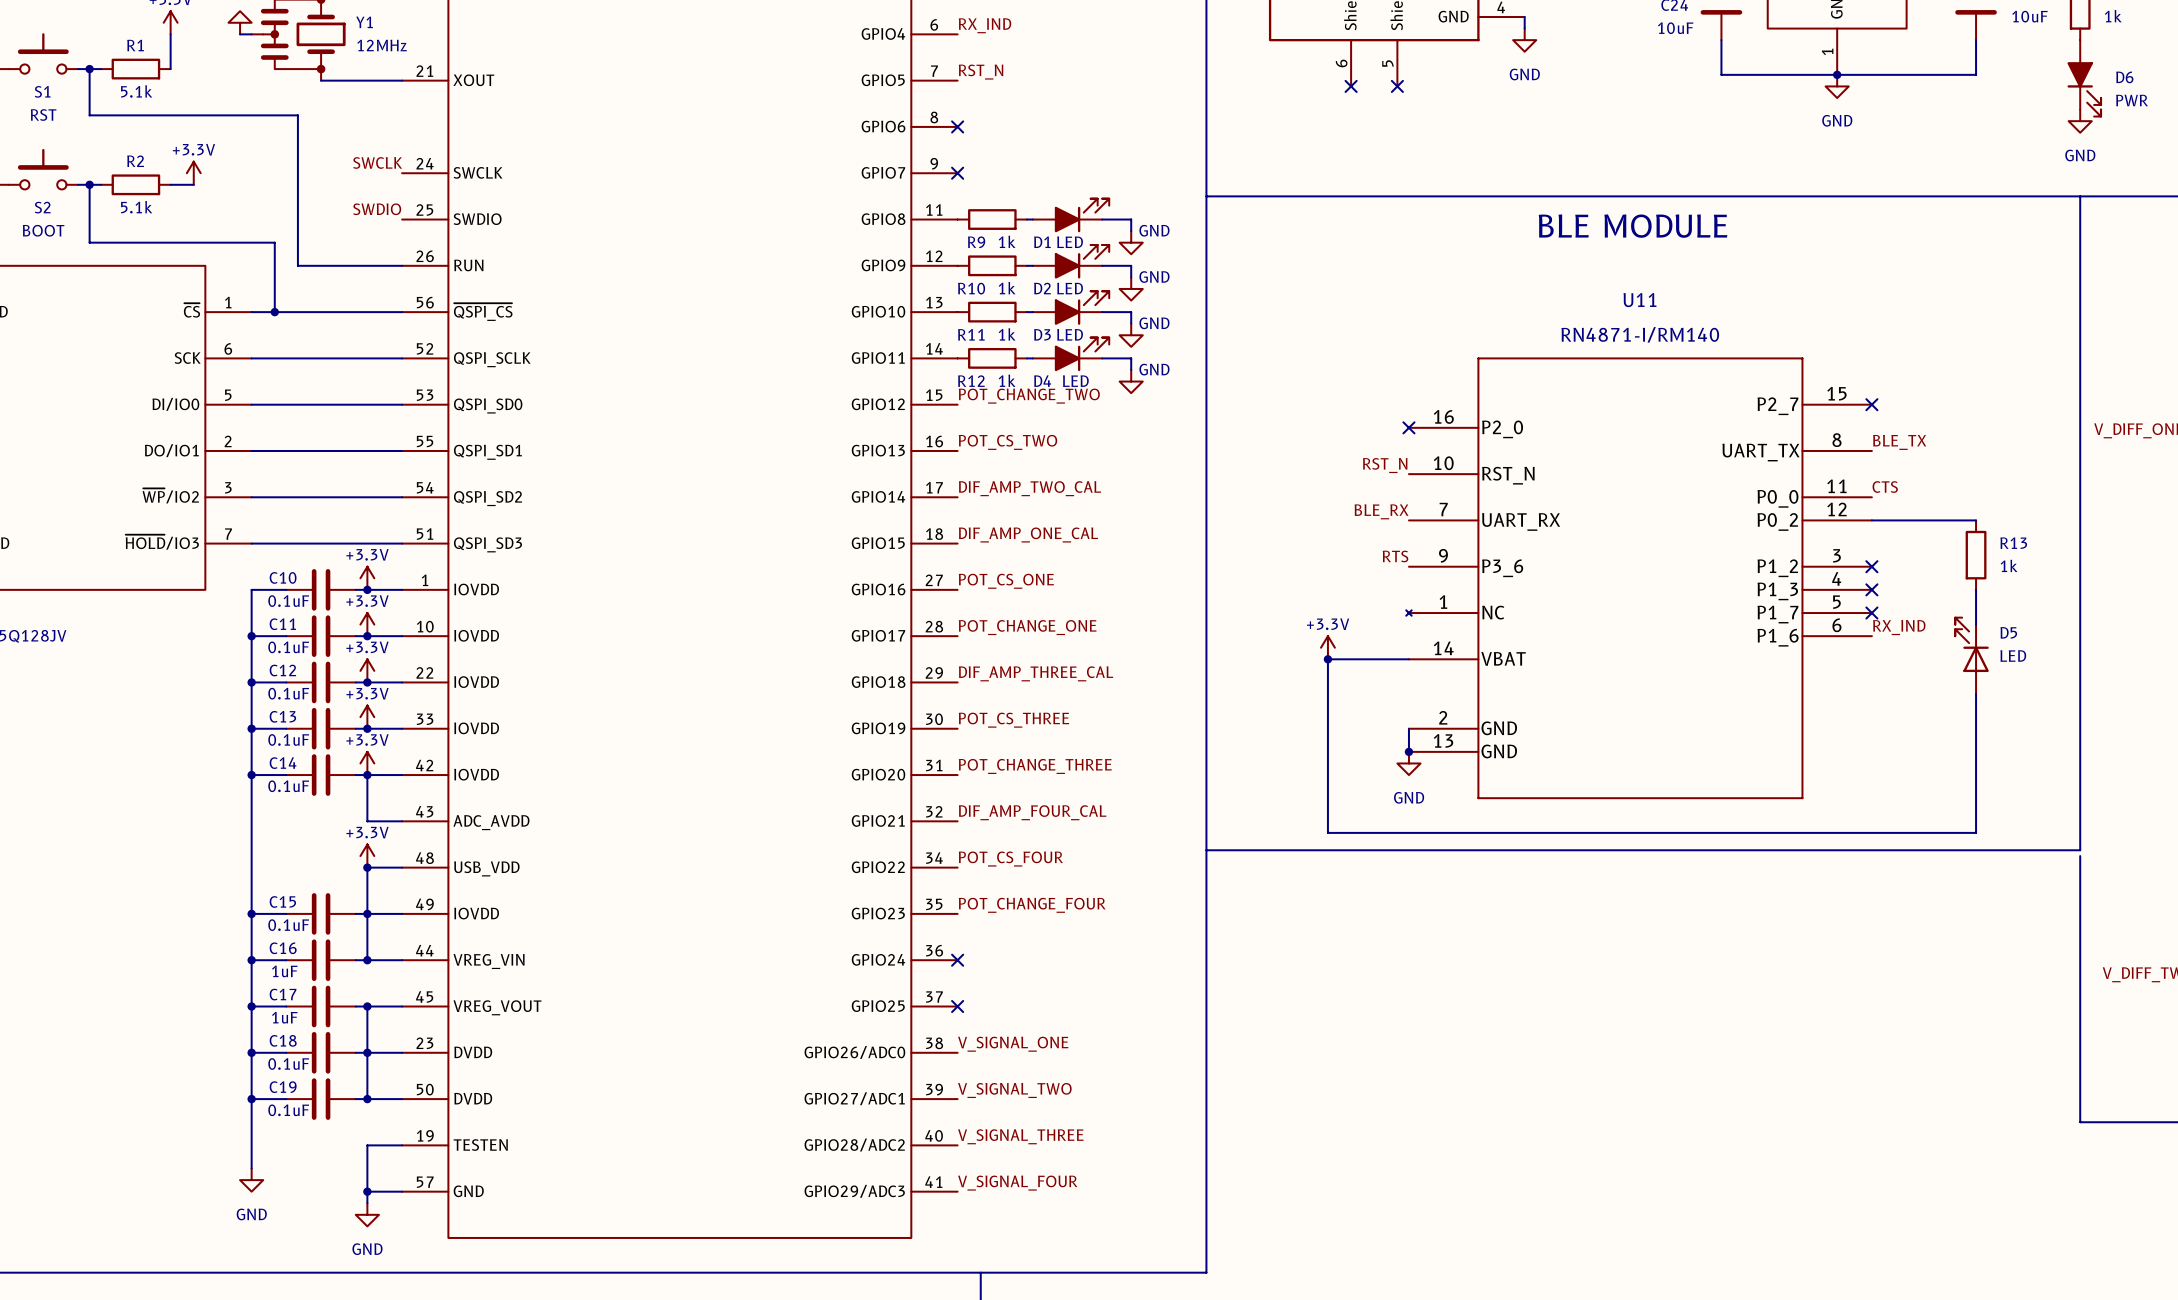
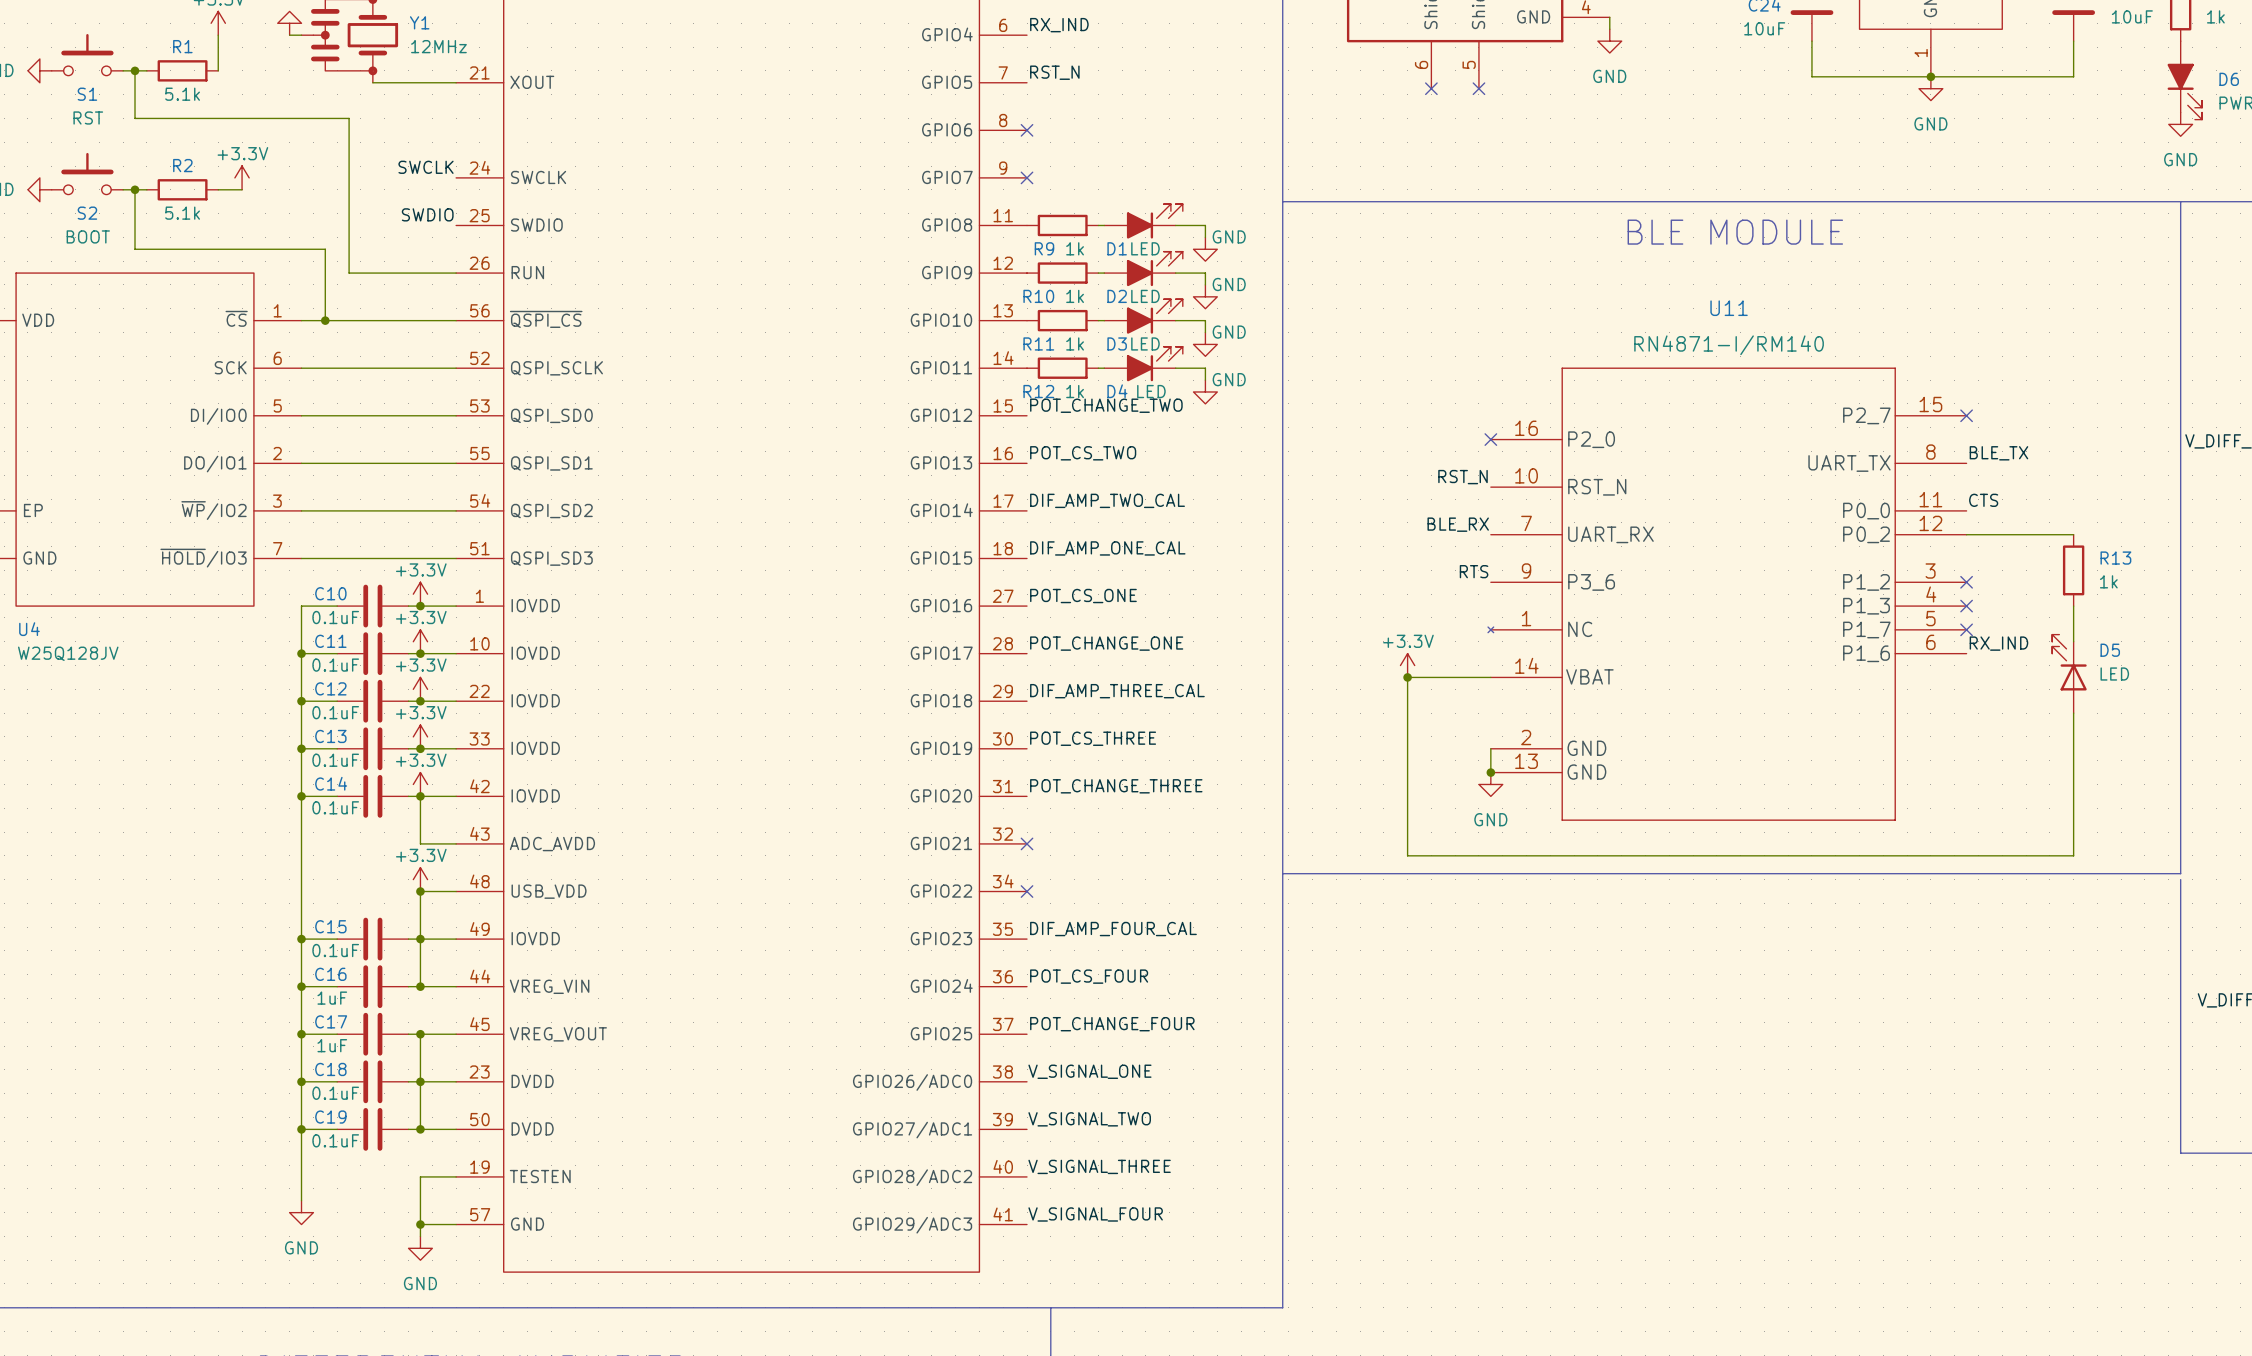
label: DIF_AMP_FOUR_CAL (1032, 812) -> none
no-connect mark: none -> (1027, 843)
label position: POT_CS_FOUR (1010, 859) -> POT_CS_FOUR (1089, 976)
no-connect mark: none -> (1027, 891)
label: POT_CHANGE_FOUR (1032, 905) -> DIF_AMP_FOUR_CAL (1113, 929)
no-connect mark: (957, 960) -> none
label: none -> POT_CHANGE_FOUR (1112, 1024)
no-connect mark: (957, 1006) -> none

